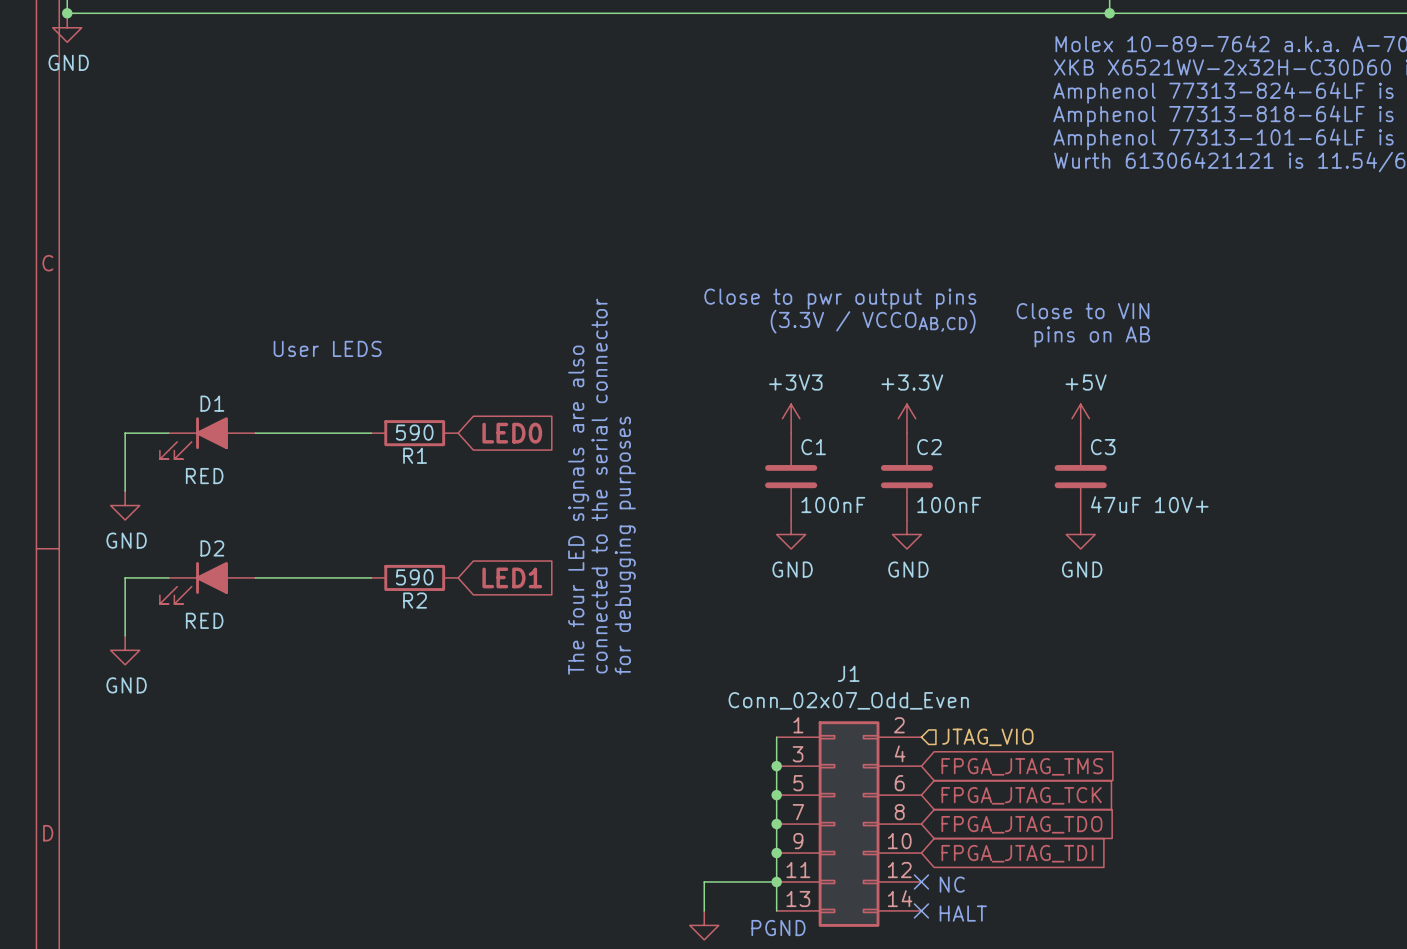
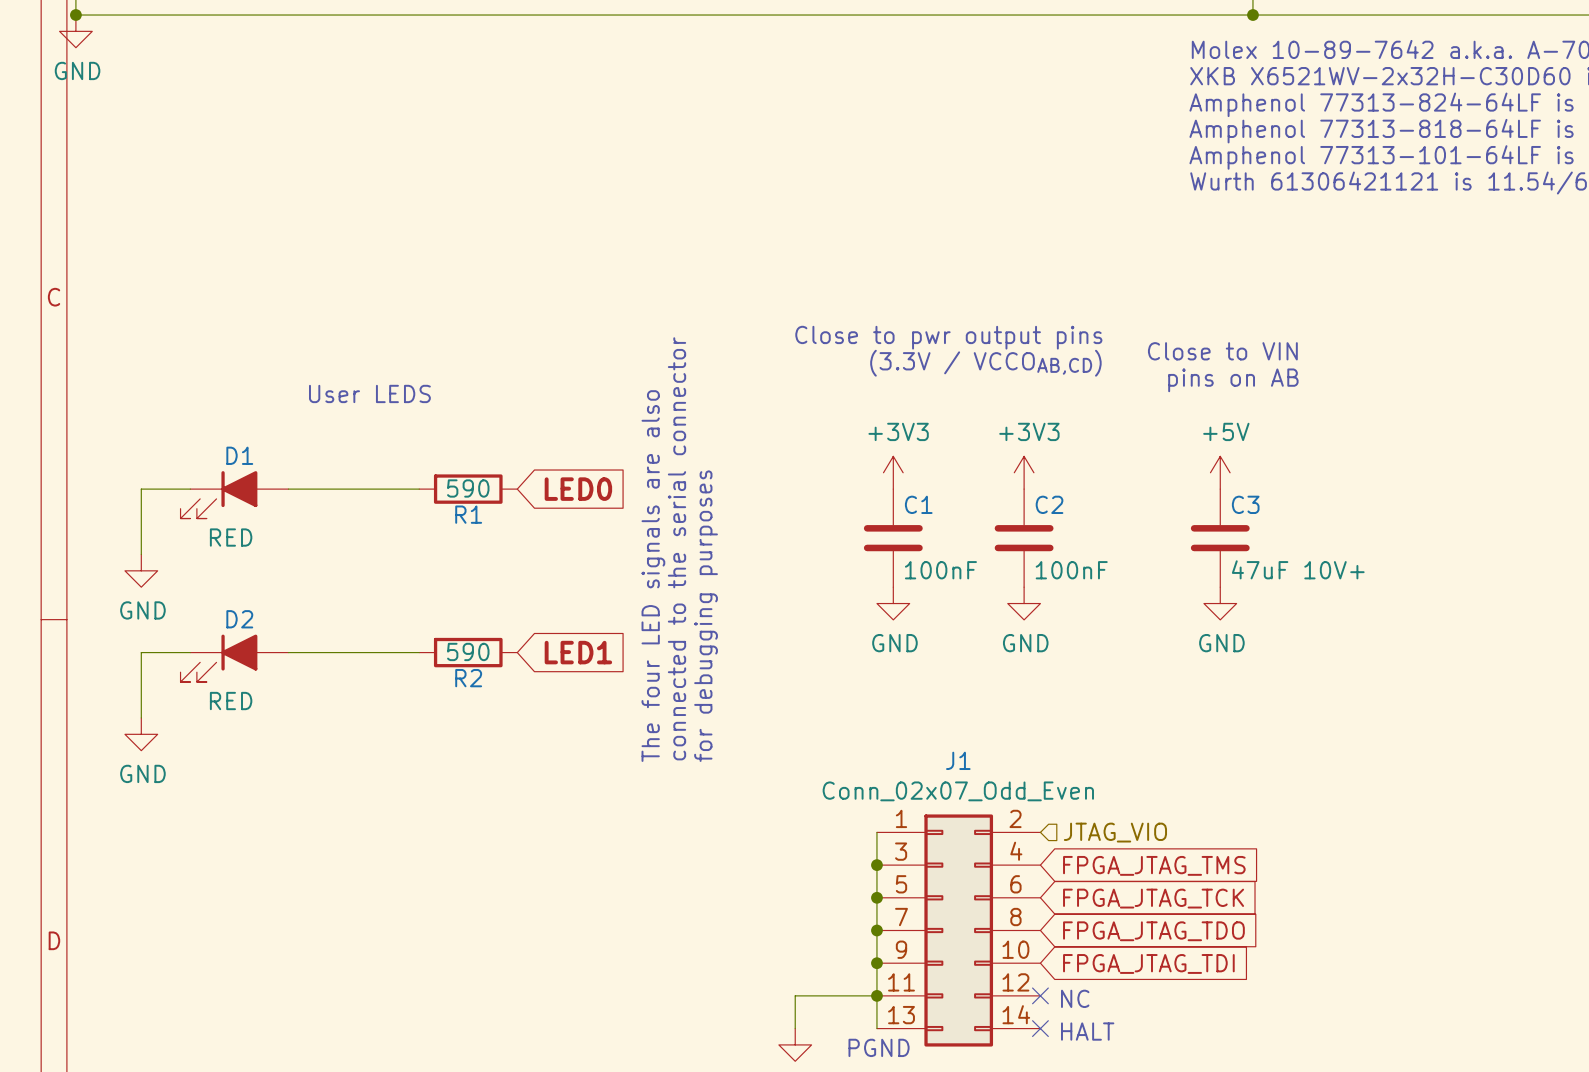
power symbol: +3.3V (906, 418) -> +3V3 (1024, 472)

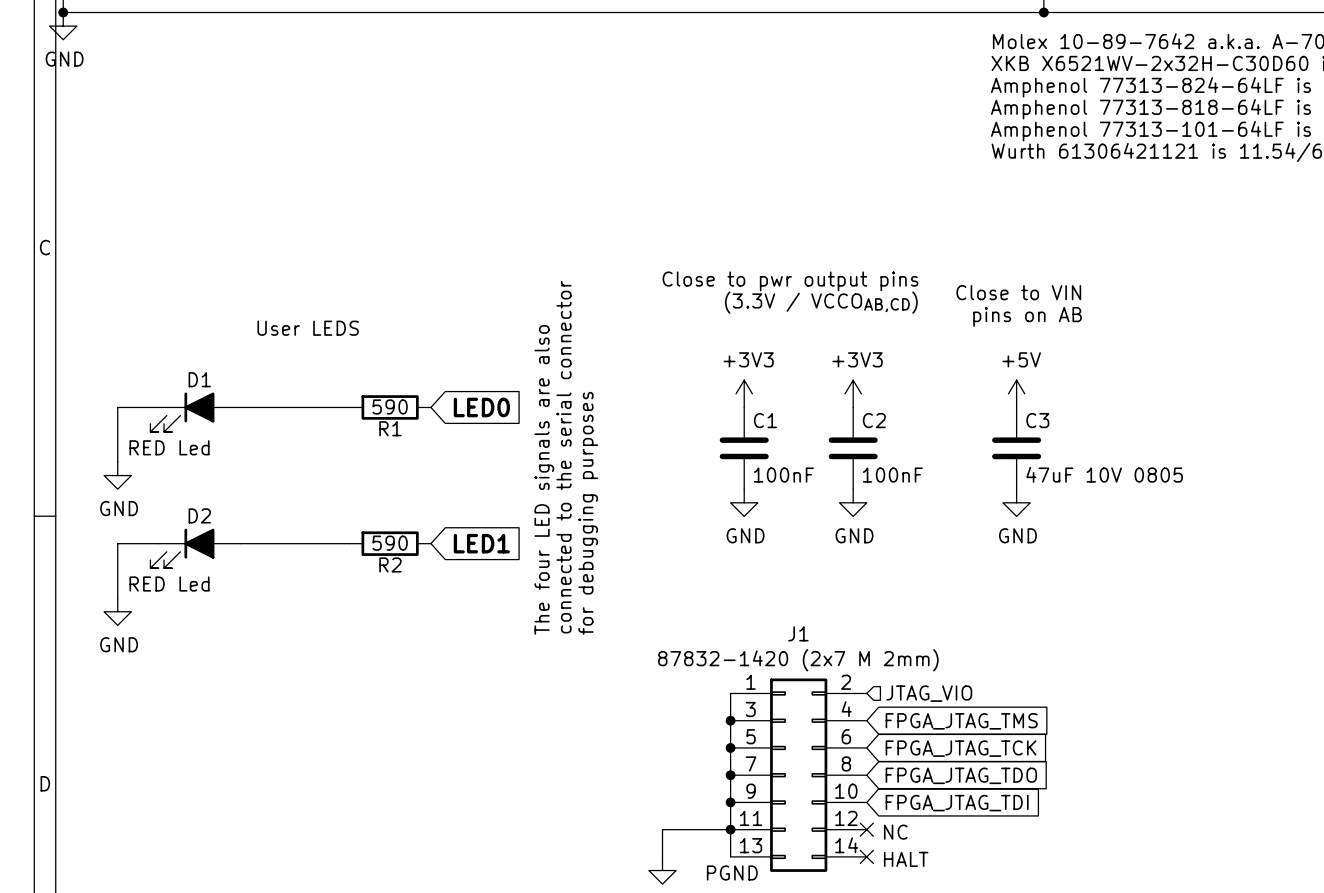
D1 value: RED (231, 537) -> RED Led (169, 447)
C3 value: 47uF 10V+ (1298, 569) -> 47uF 10V 0805 (1104, 474)
D2 value: RED (231, 701) -> RED Led (169, 584)
J1 value: Conn_02x07_Odd_Even (958, 791) -> 87832-1420 (2x7 M 2mm) (798, 660)

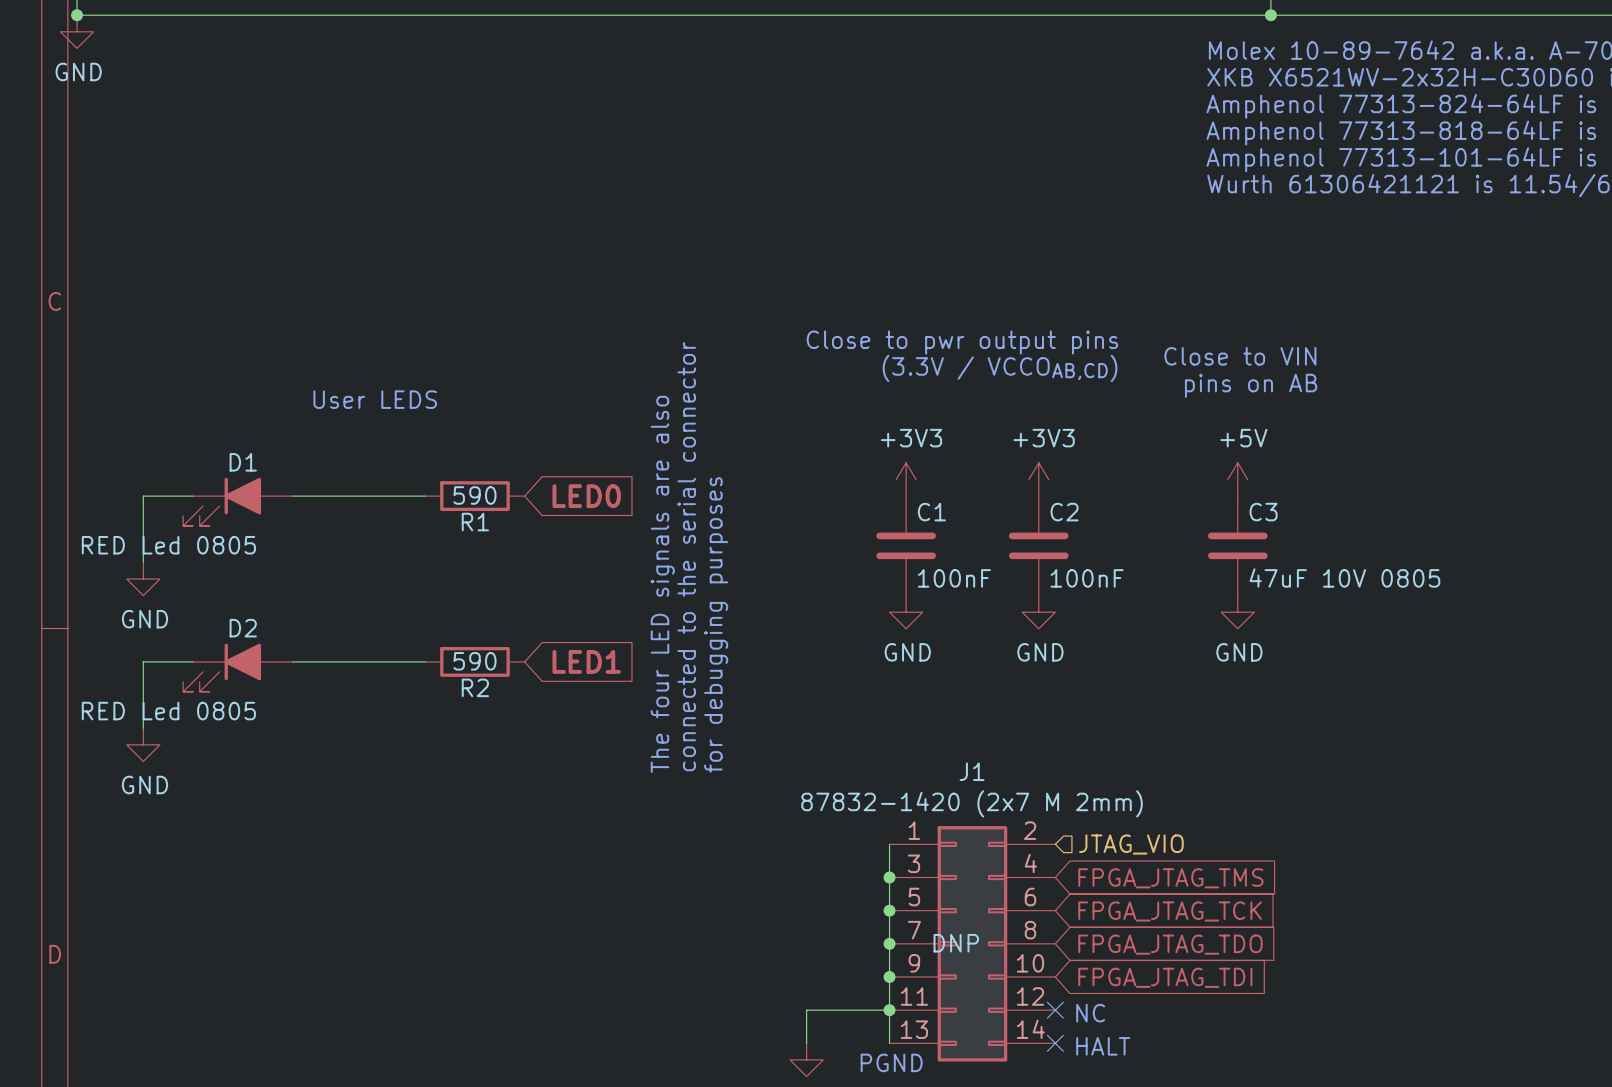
D1 value: RED Led (169, 447) -> RED Led 0805 (168, 545)
D2 value: RED Led (169, 584) -> RED Led 0805 (168, 711)
J1 text: none -> DNP (956, 943)

